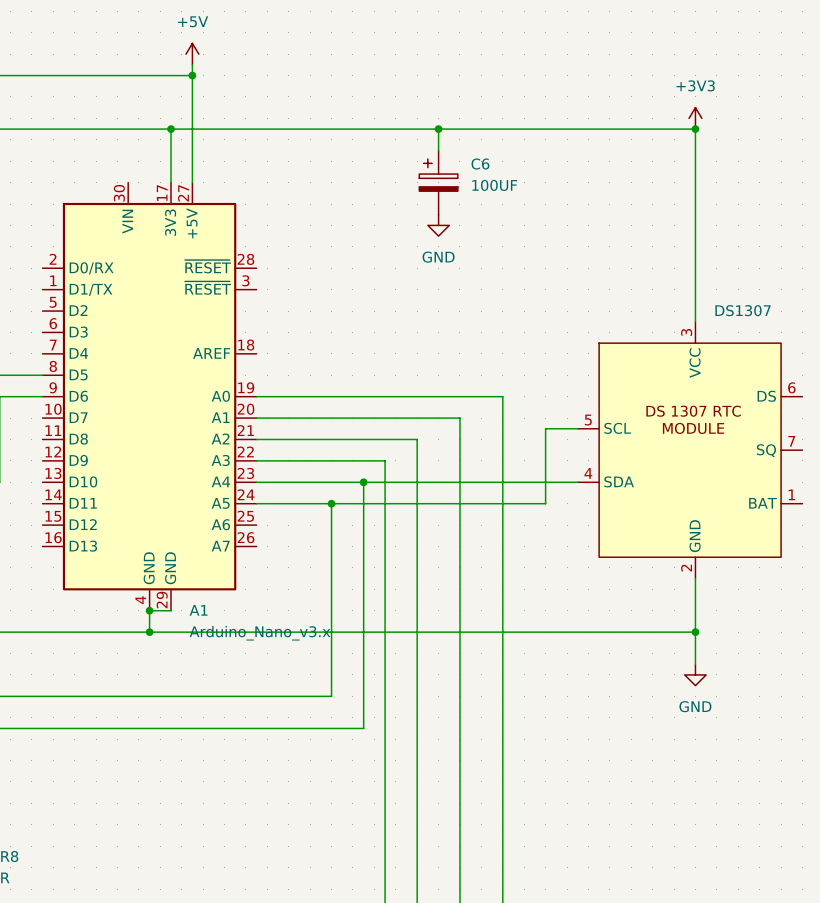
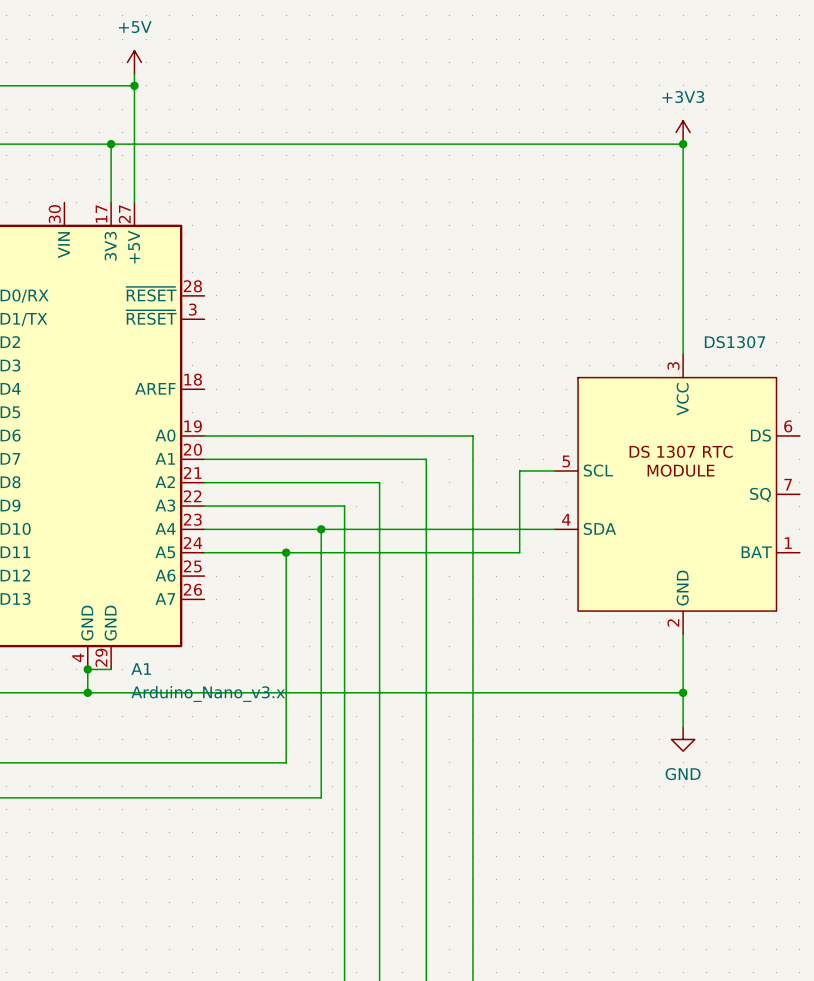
wire: (438, 129) (438, 150) -> none
junction: (438, 129) -> none
C6: 100UF (438, 182) -> none
power symbol: GND (438, 225) -> none

